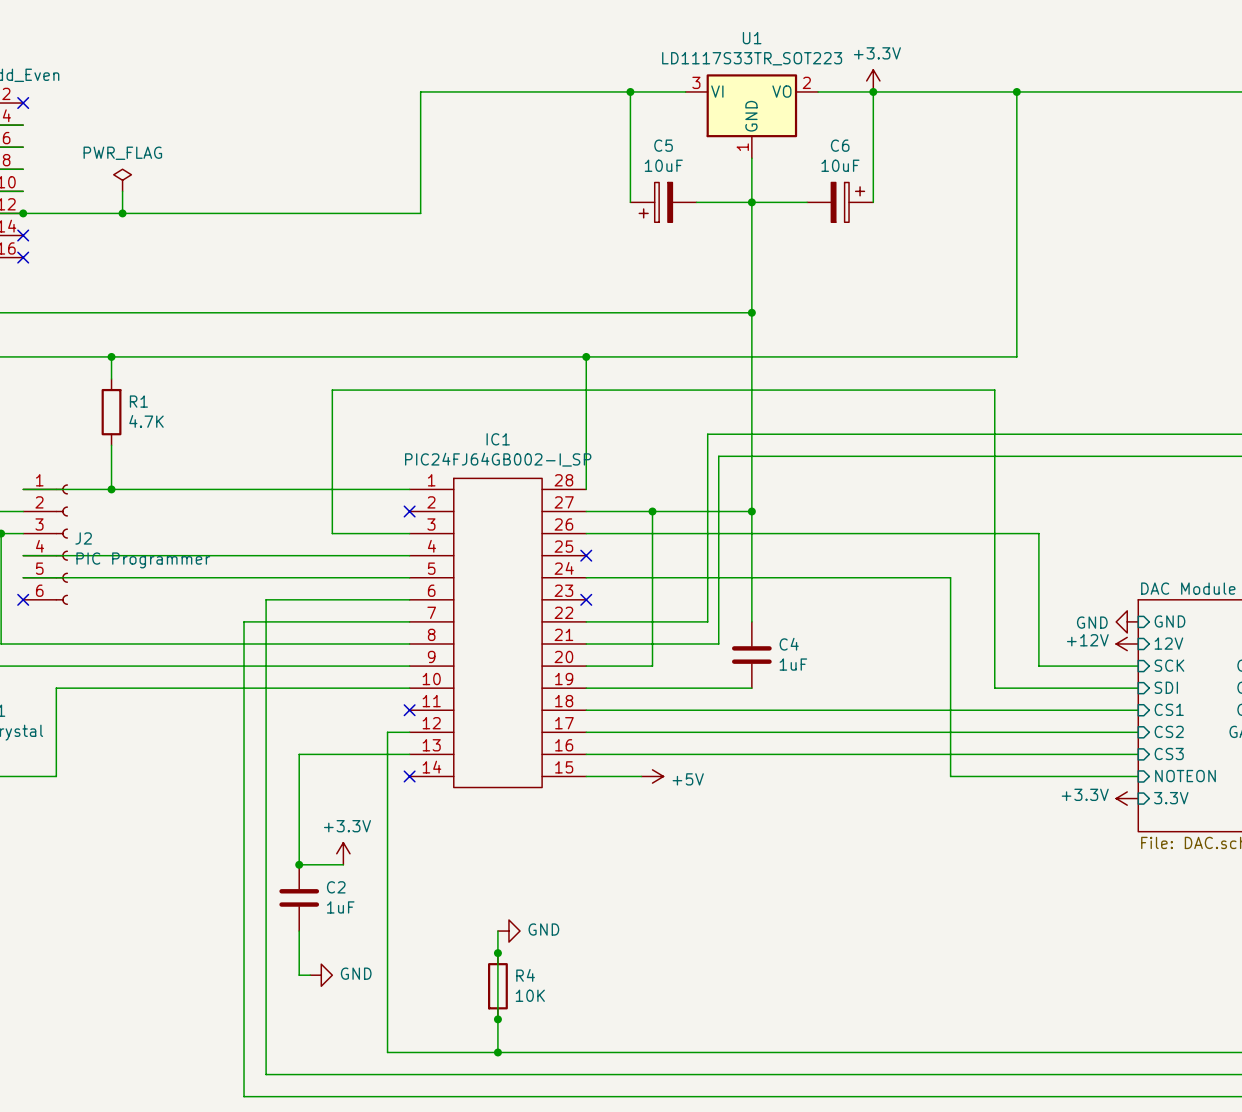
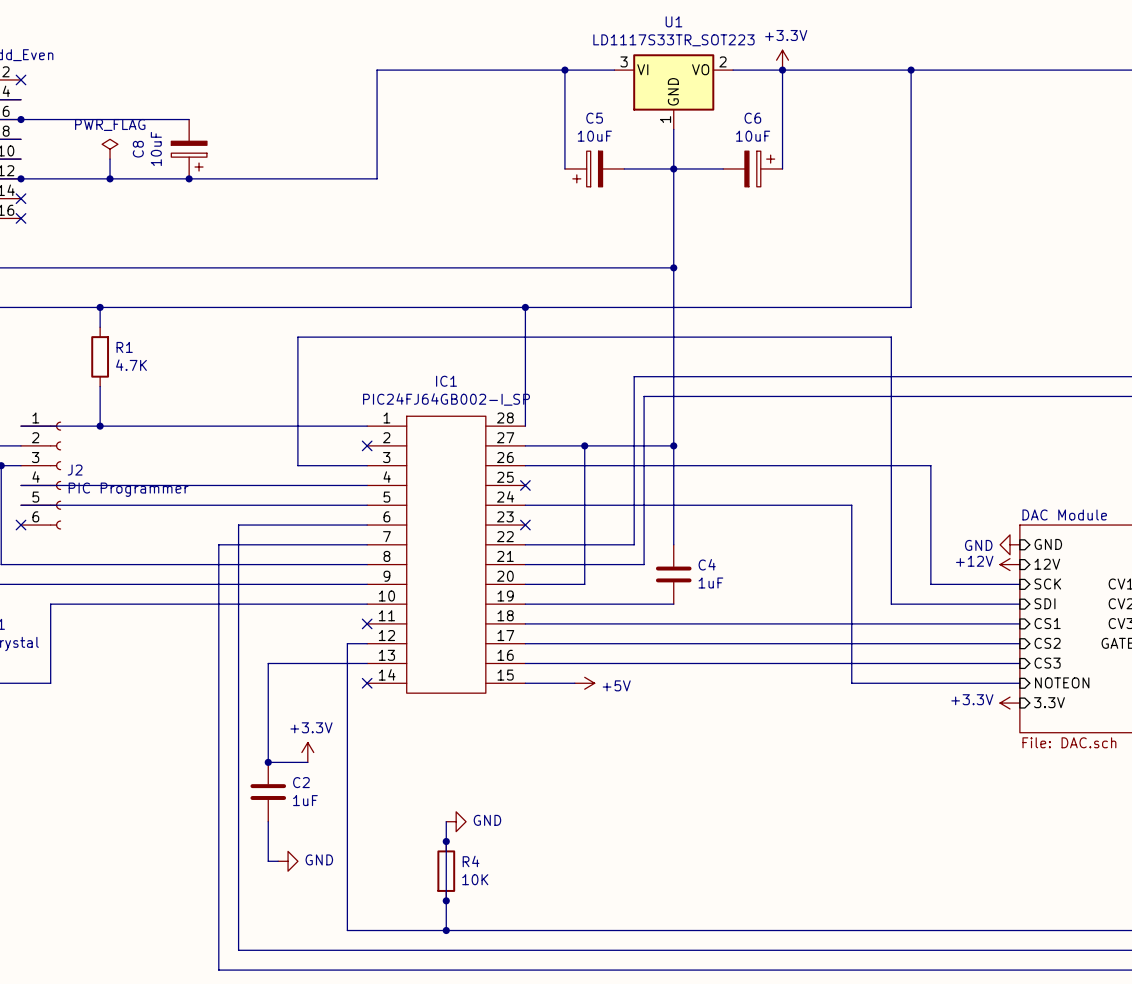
wire: none -> (21, 119) (189, 119)
junction: none -> (21, 119)
C8: none -> 10uF (189, 149)
junction: none -> (189, 178)

